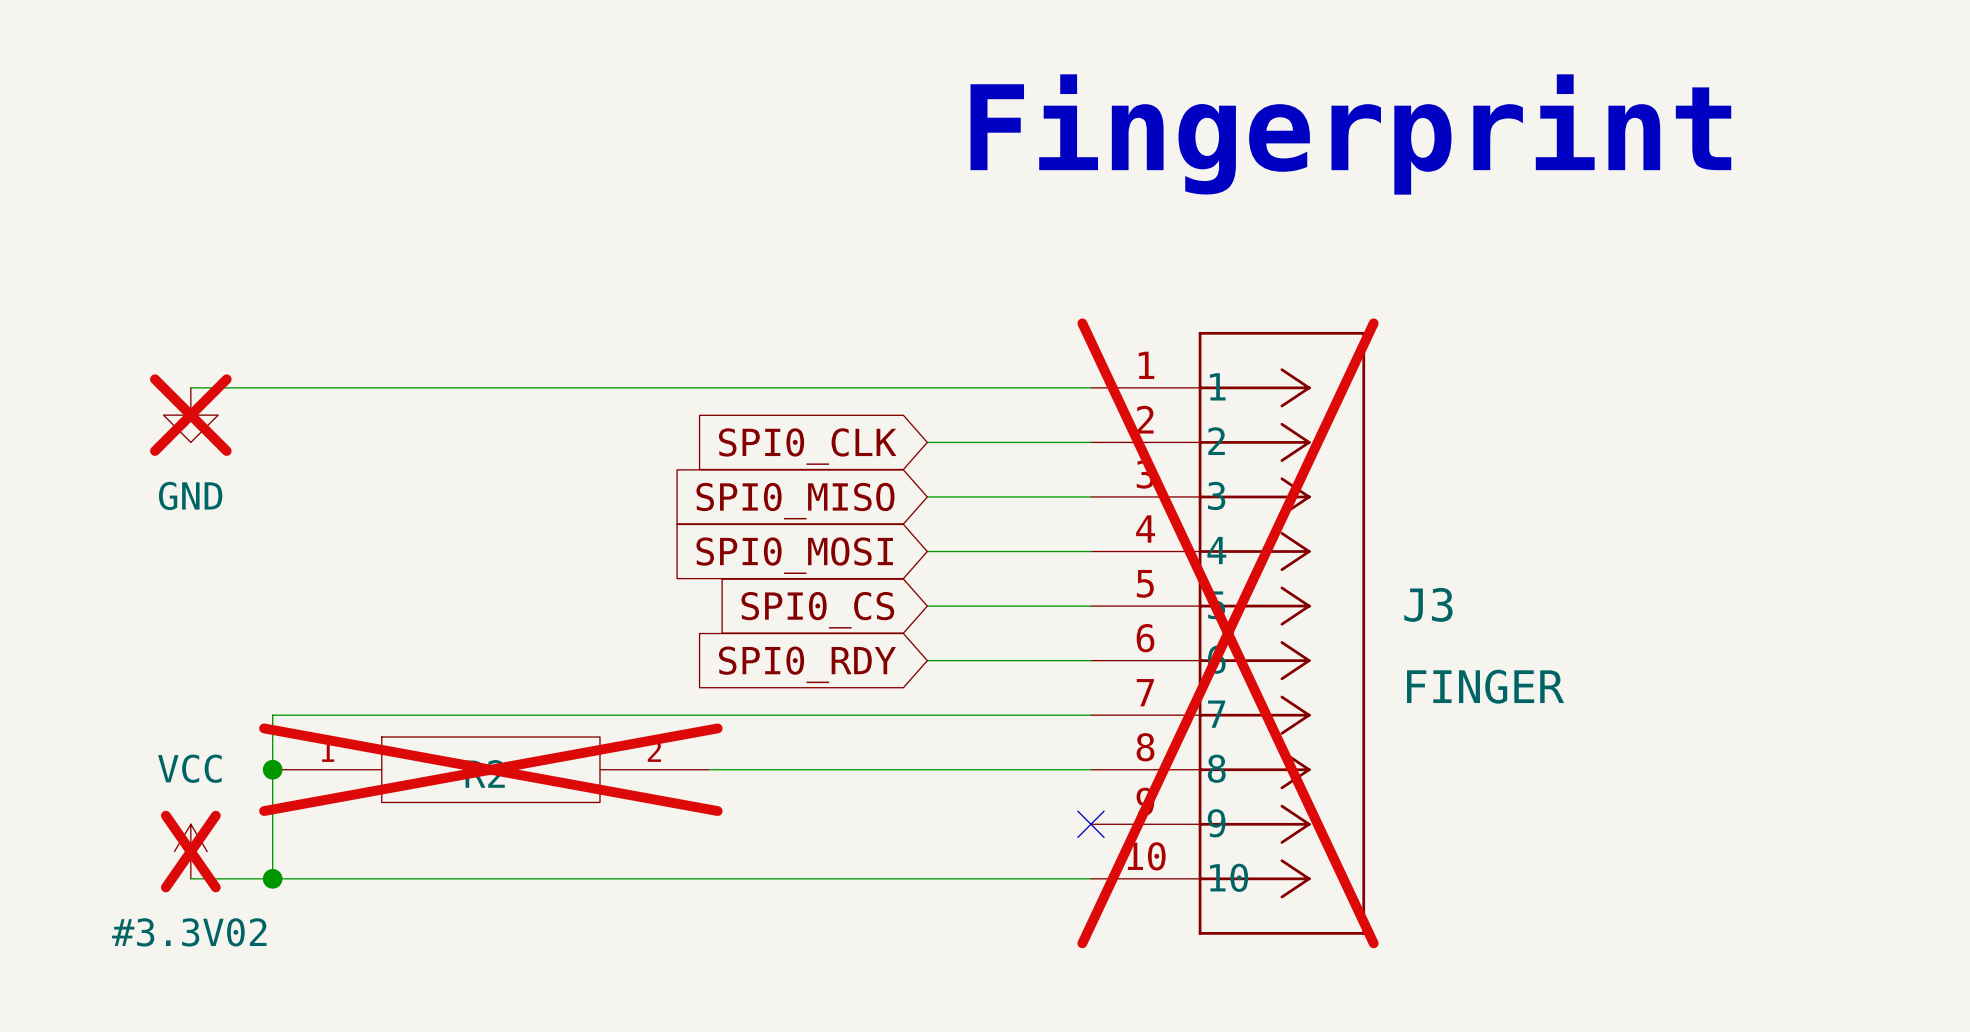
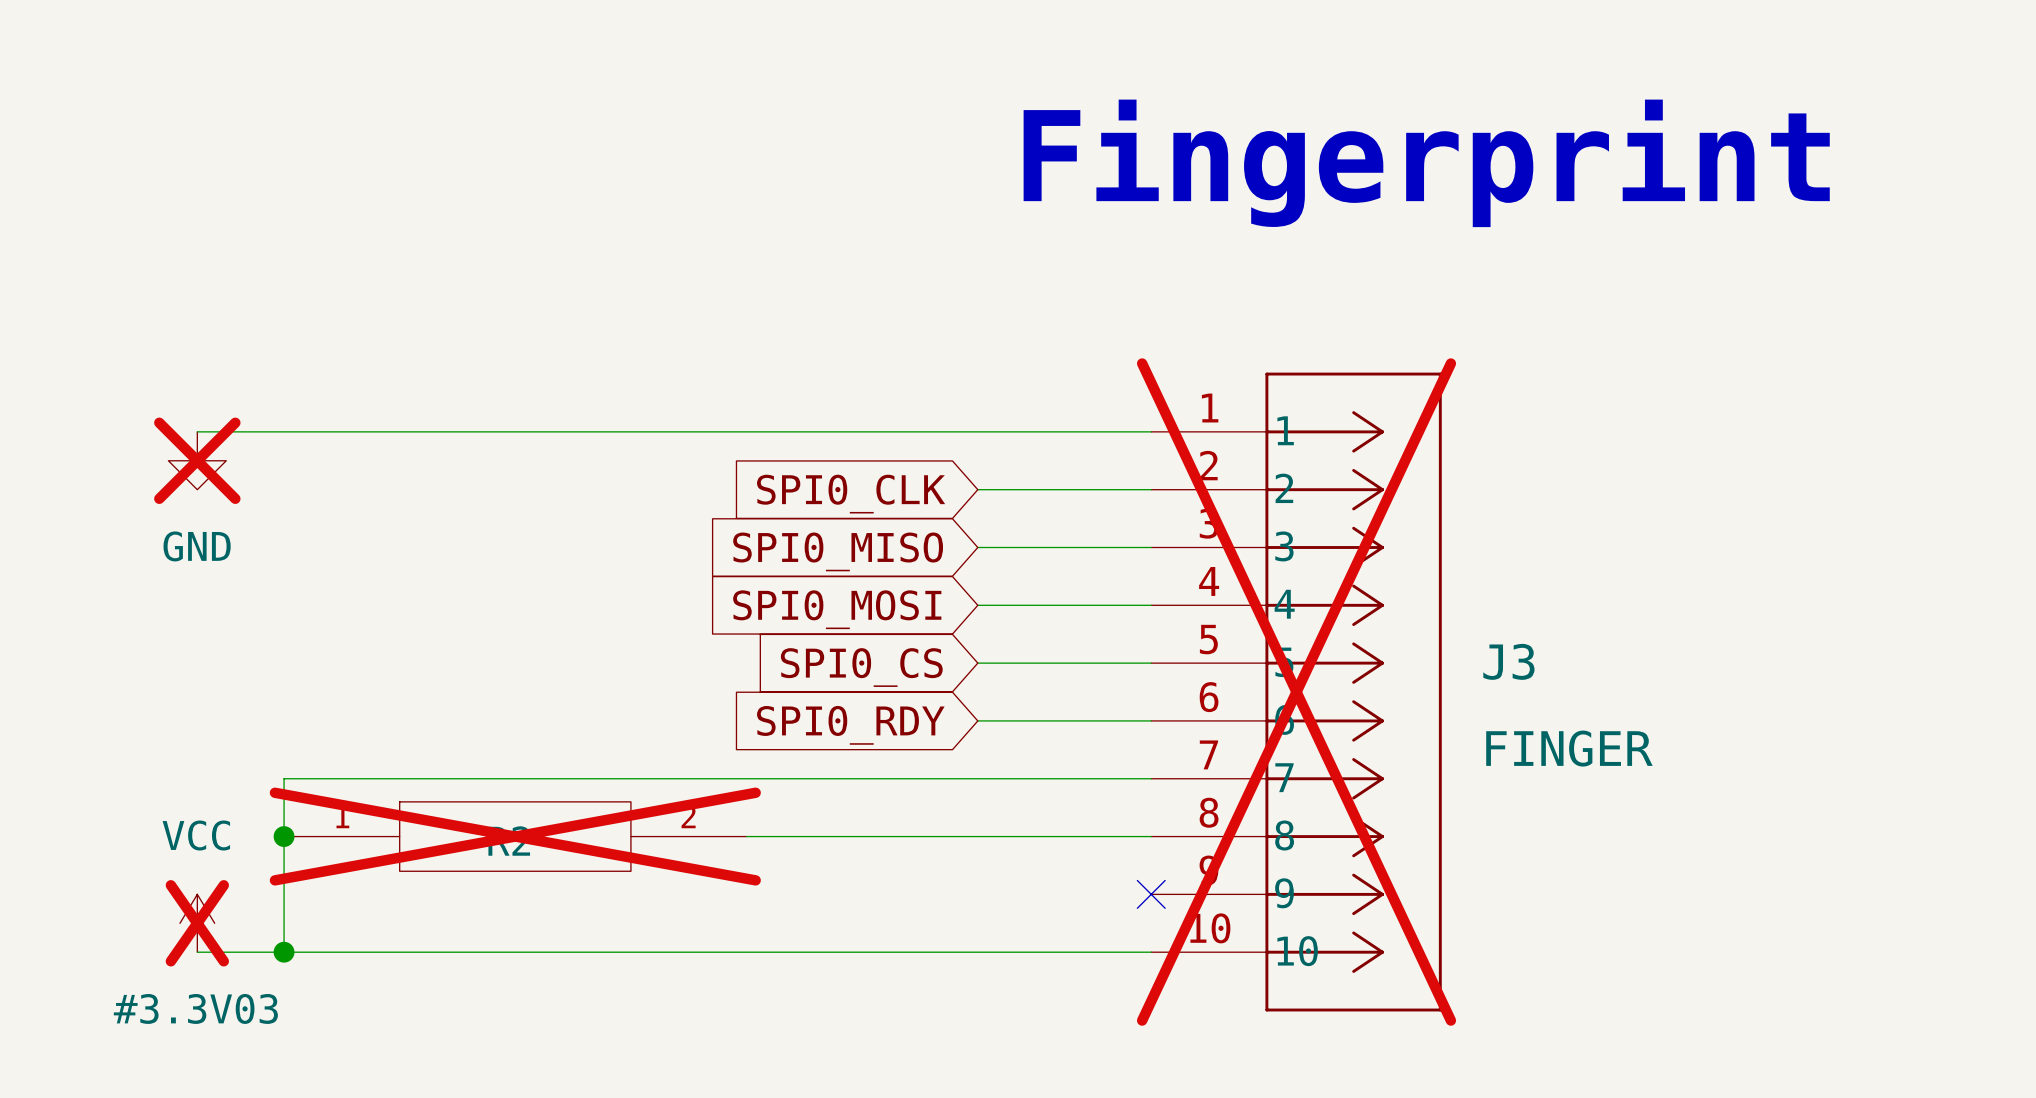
#3.3V02 name: #3.3V02 (189, 932) -> #3.3V03 (195, 1008)

